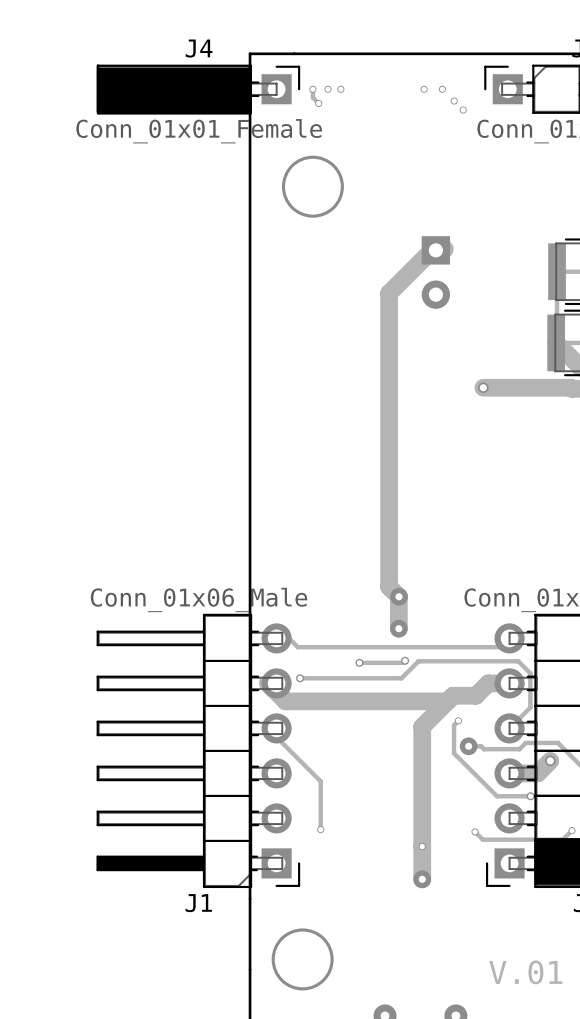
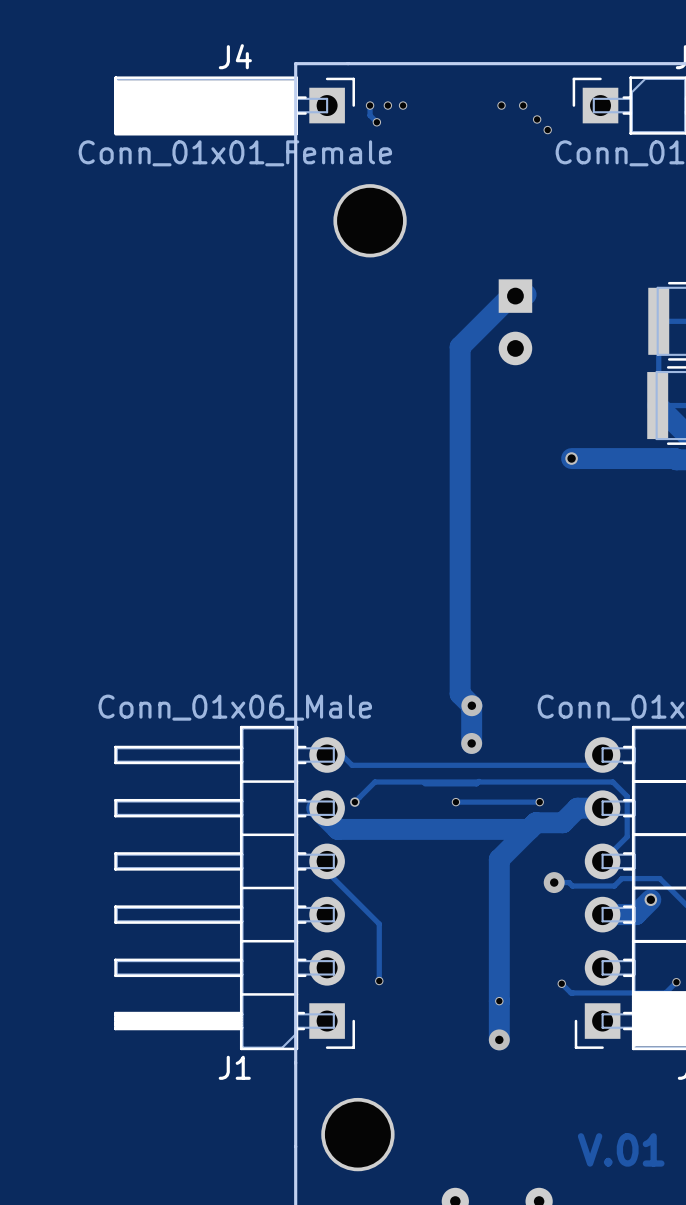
via: (405, 660) -> none
track: (418, 661) (401, 678) -> (539, 802) (474, 802)
via: (359, 662) -> none
track: (385, 678) (300, 678) -> (494, 782) (374, 782) (354, 802)
via: none -> (455, 802)
via: none -> (539, 802)
track: (458, 720) (454, 725) (454, 753) (496, 796) (530, 796) -> none
via: (458, 720) -> none
via: (530, 796) -> none

